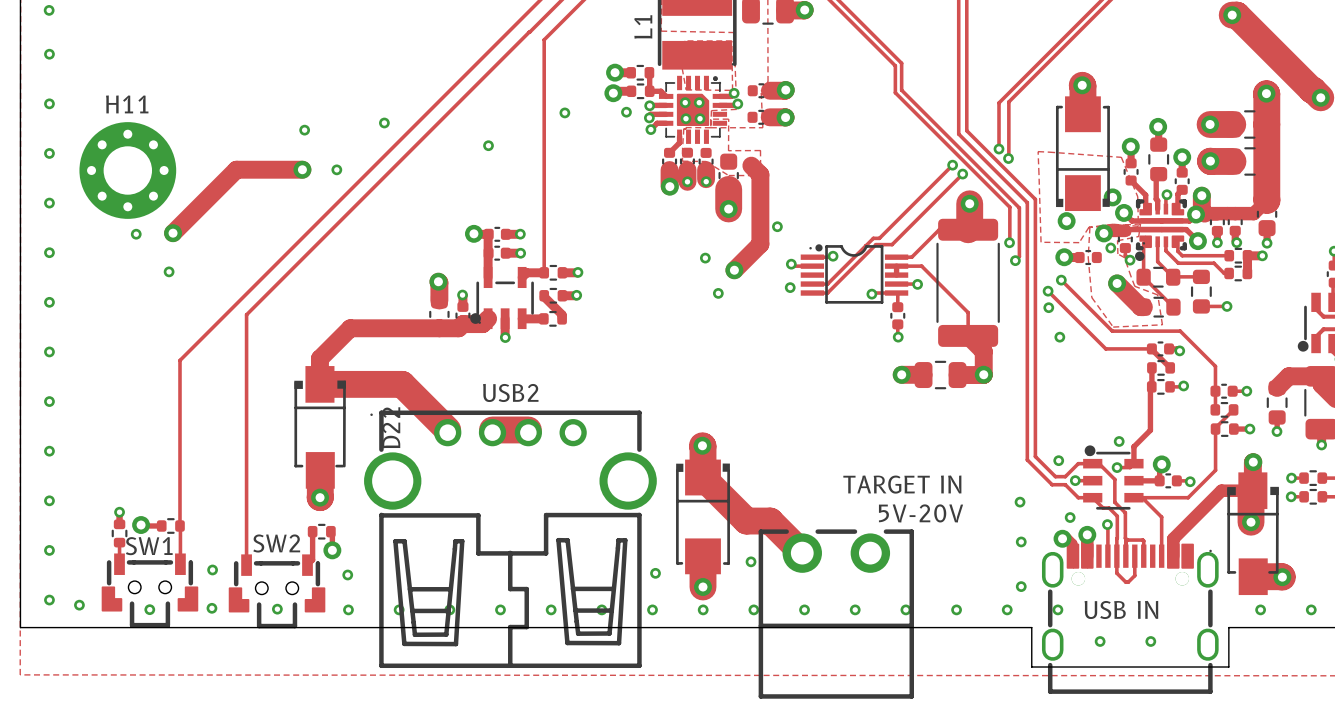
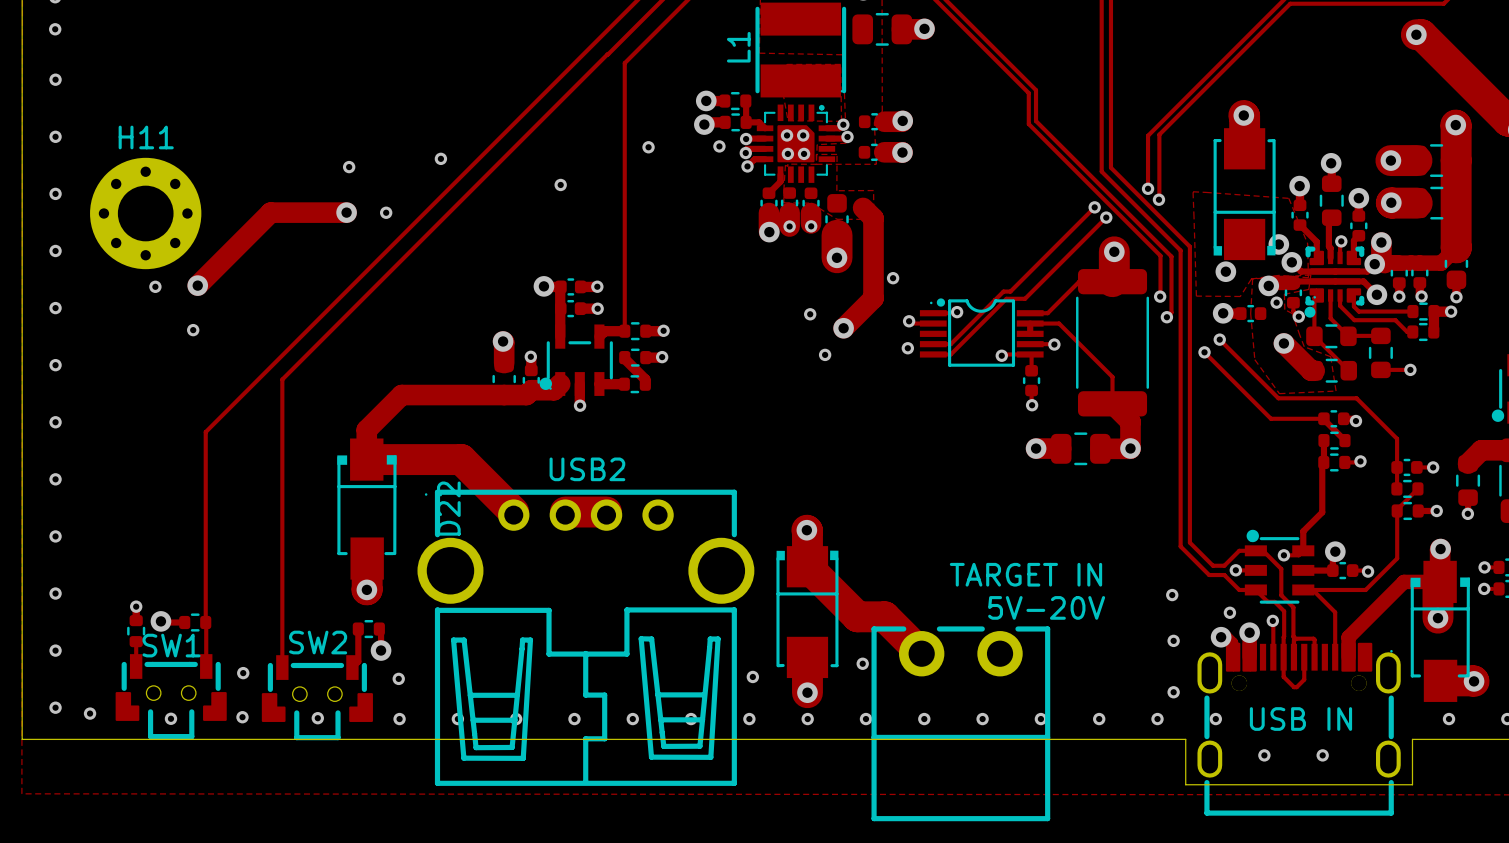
via: (1048, 307) -> none
via: (1059, 337) -> none
via: (1119, 441) -> none
via: (1058, 460) -> none

